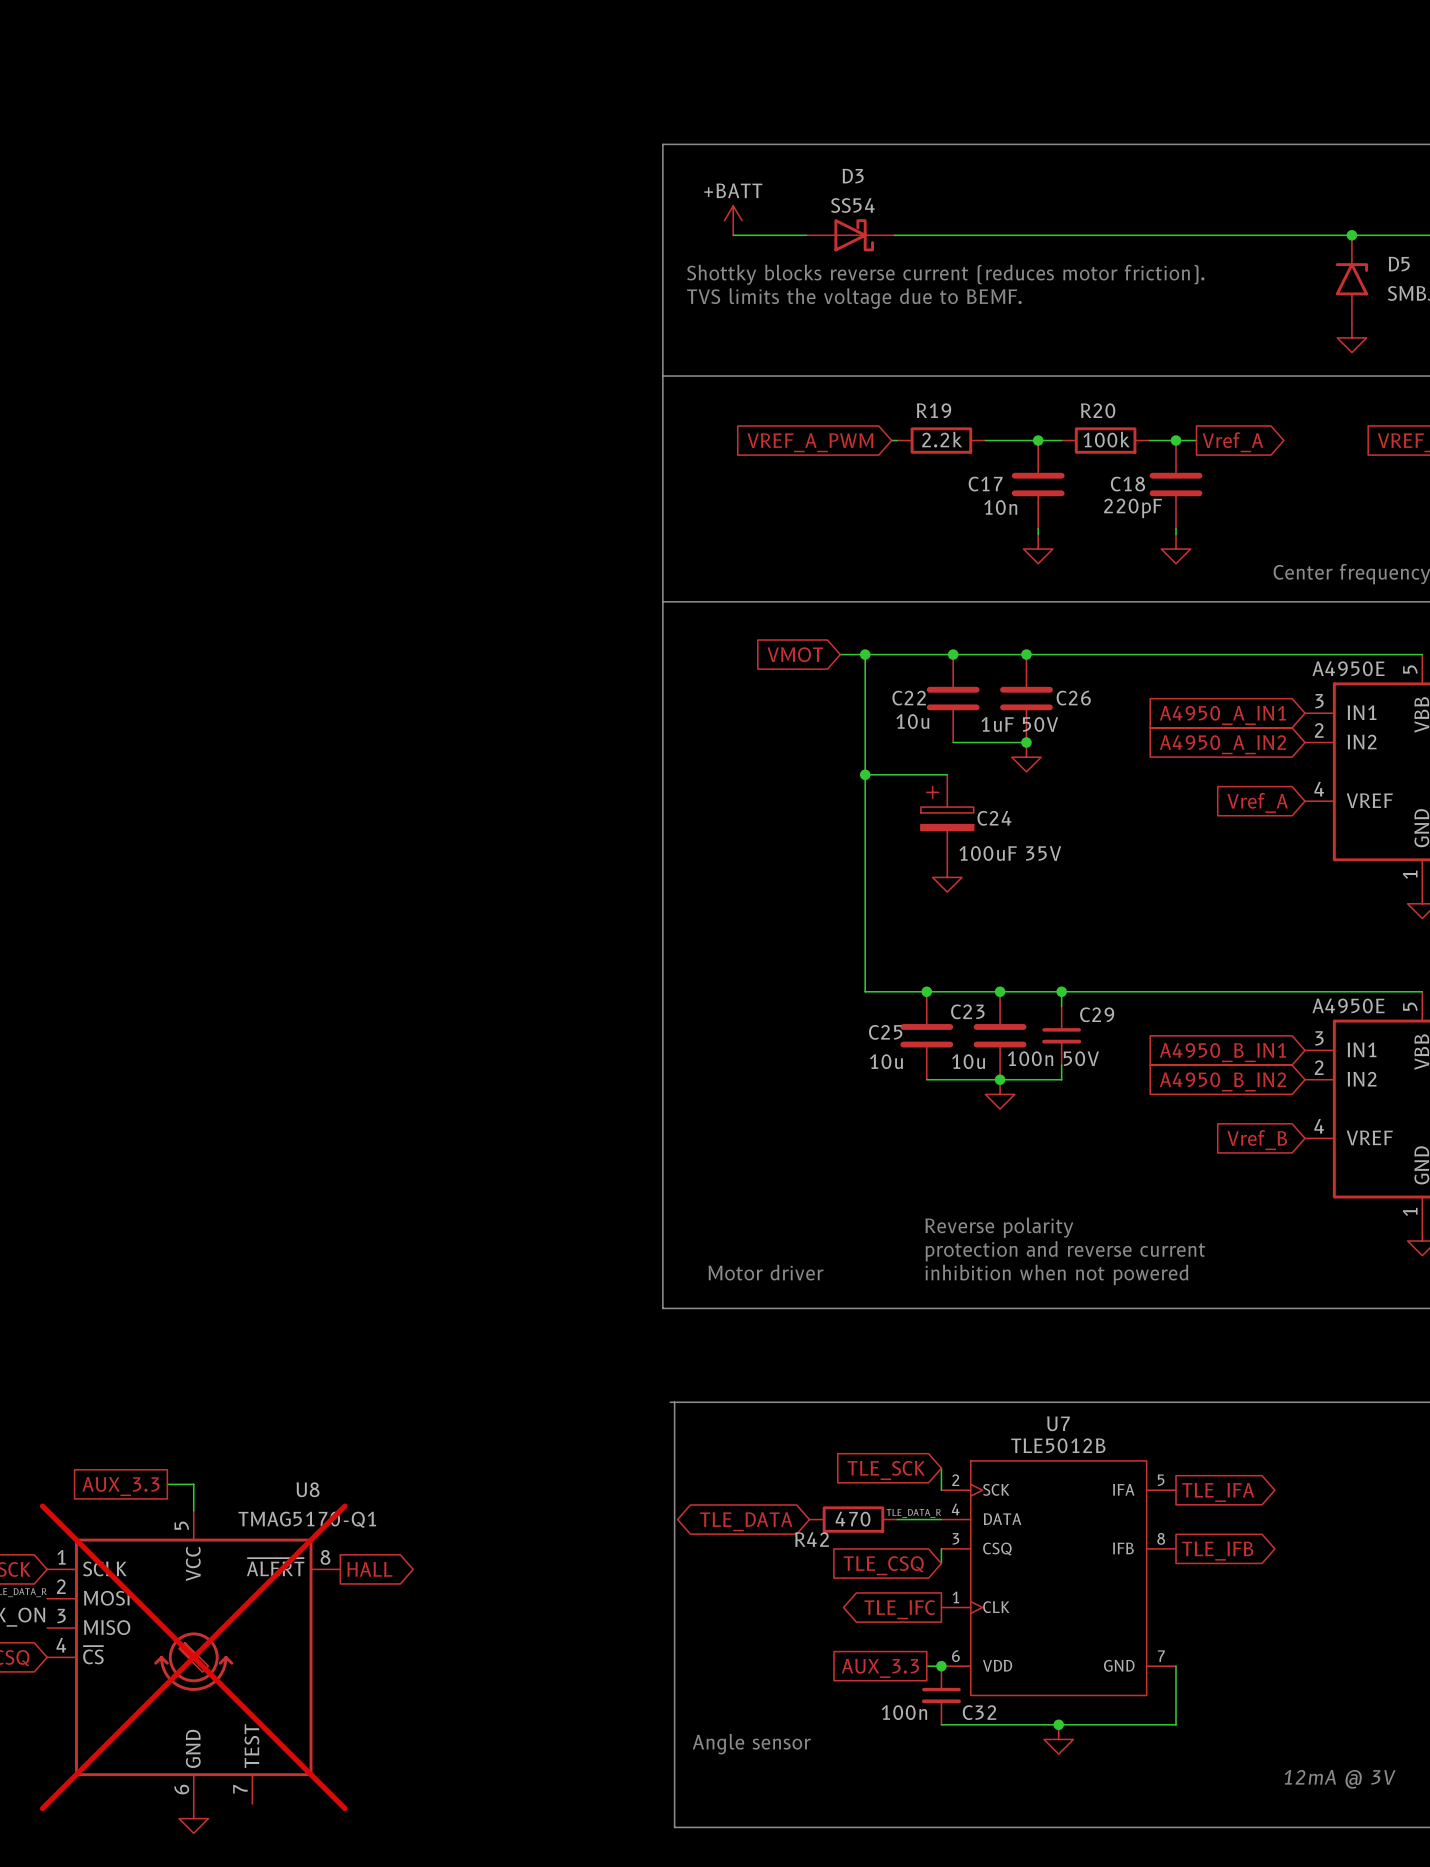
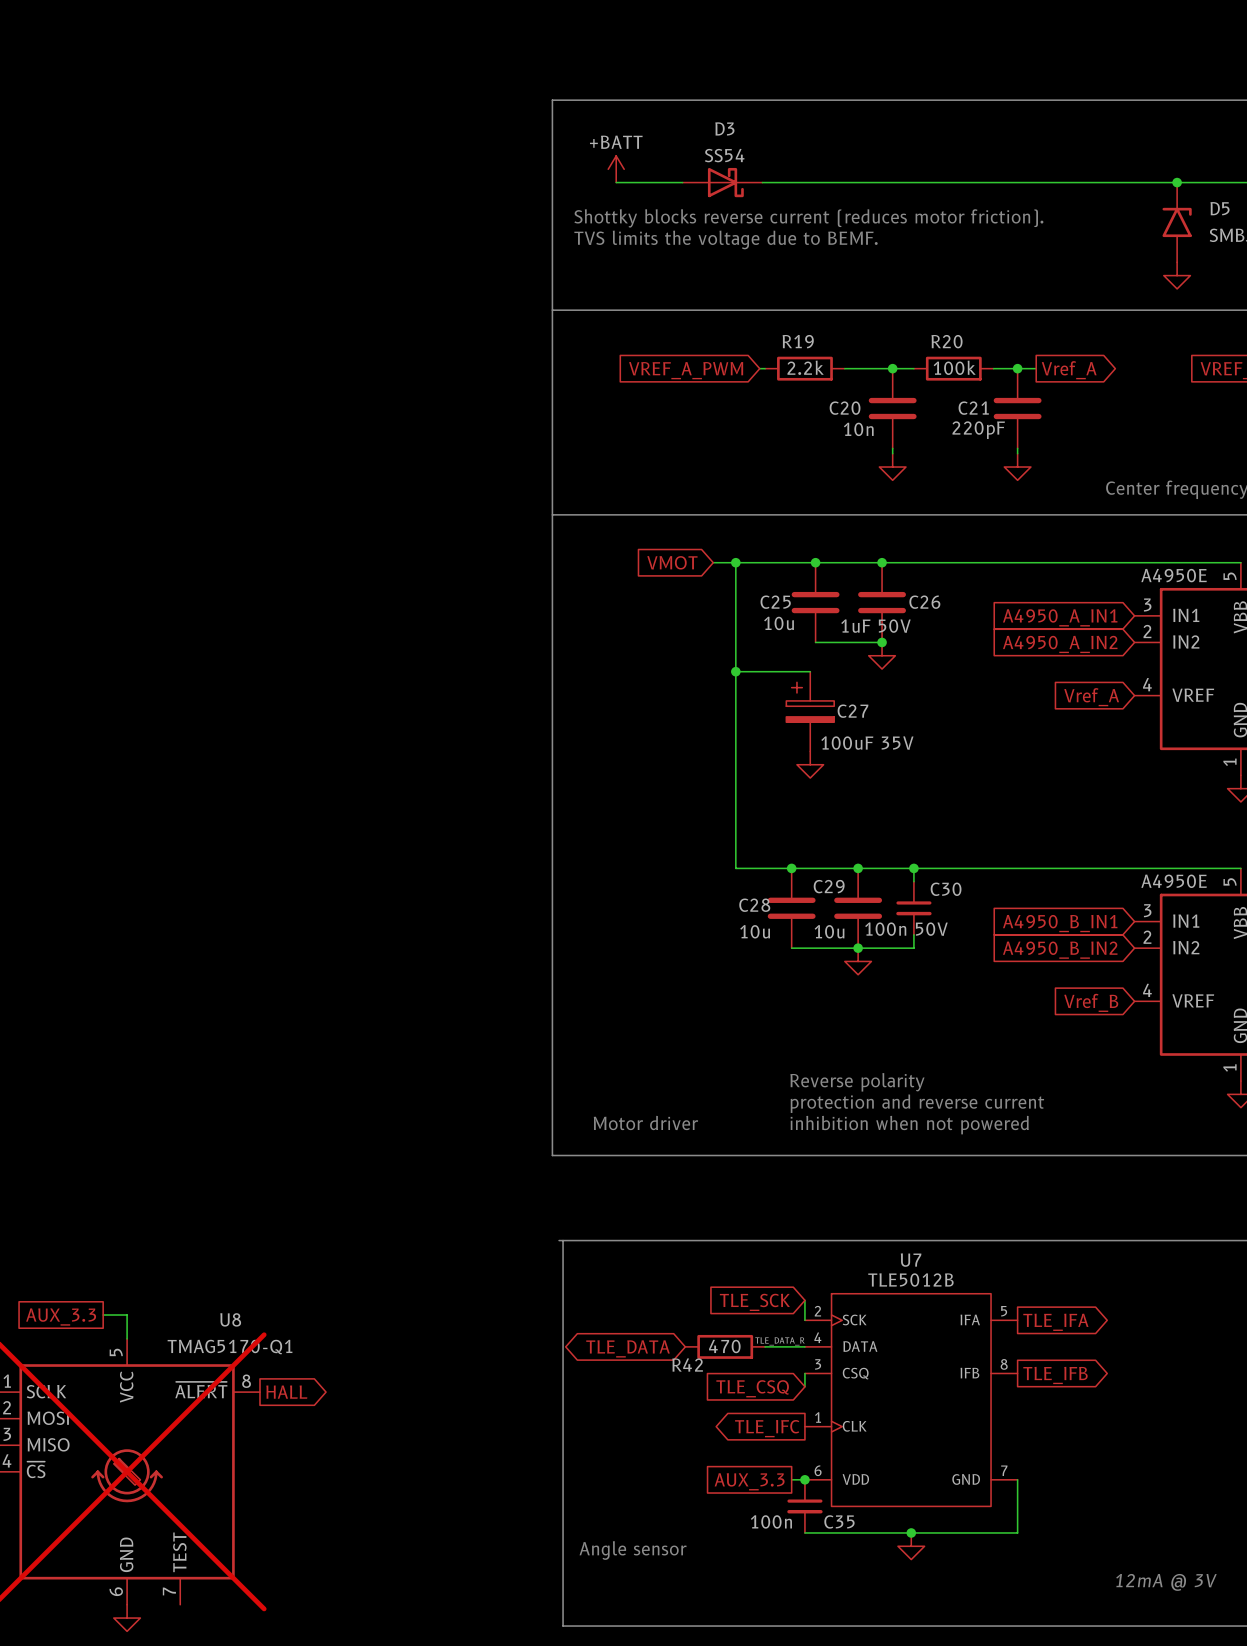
C17 name: C17 (985, 484) -> C20 (845, 408)
C18 name: C18 (1127, 484) -> C21 (973, 408)
C22 name: C22 (909, 698) -> C25 (775, 602)
C24 name: C24 (994, 818) -> C27 (852, 711)
C23 name: C23 (967, 1011) -> C29 (829, 886)
C29 name: C29 (1097, 1014) -> C30 (946, 889)
C25 name: C25 (885, 1032) -> C28 (754, 905)
C32 name: C32 (979, 1712) -> C35 (839, 1521)

